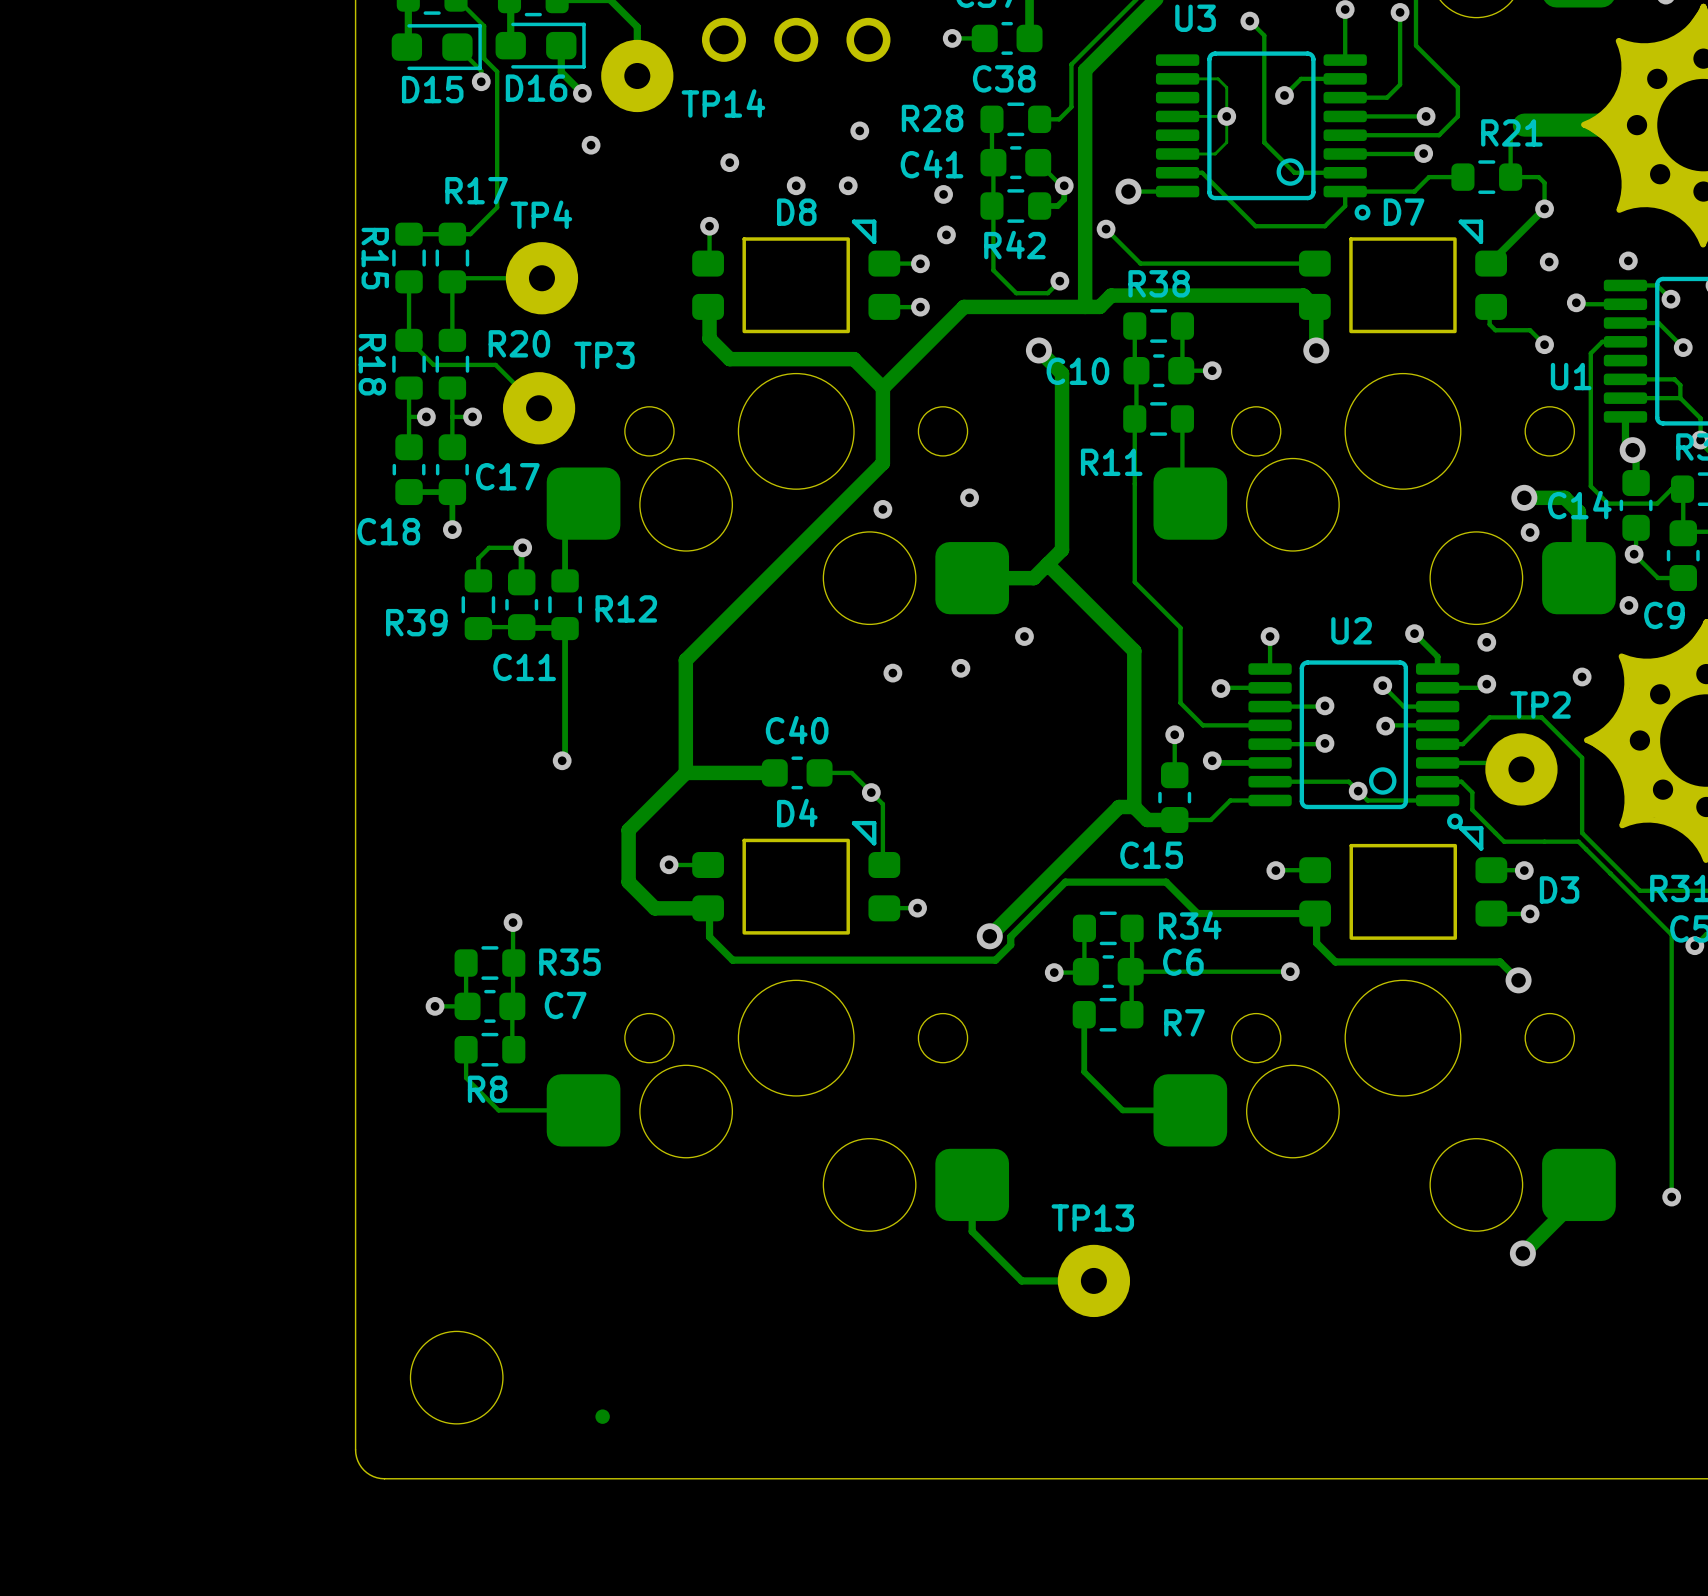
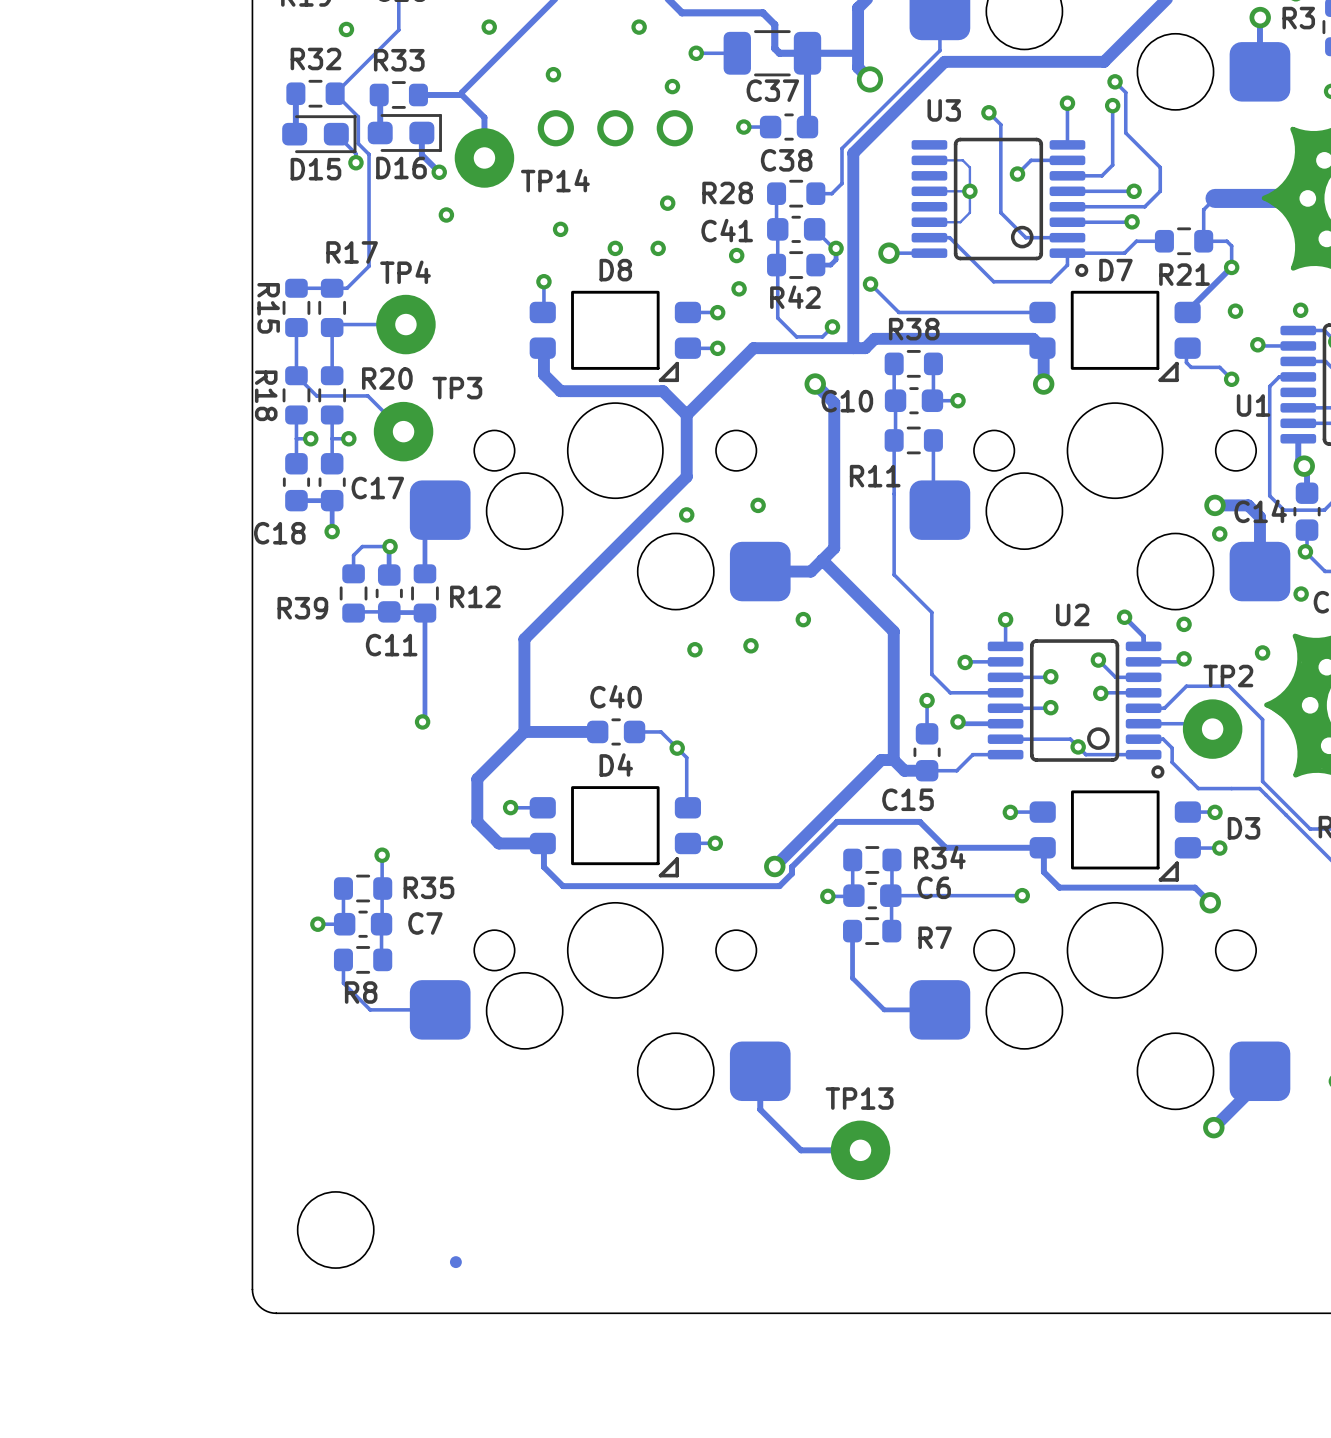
R21 name position: R21 (1511, 132) -> R21 (1184, 274)
D8 footprint: [692, 219, 901, 334] -> [529, 290, 702, 383]
D7 footprint: [1298, 219, 1508, 334] -> [1029, 290, 1201, 383]
D4 footprint: [692, 820, 901, 935] -> [529, 786, 702, 878]
D3 footprint: [1299, 826, 1508, 940] -> [1029, 790, 1201, 882]

